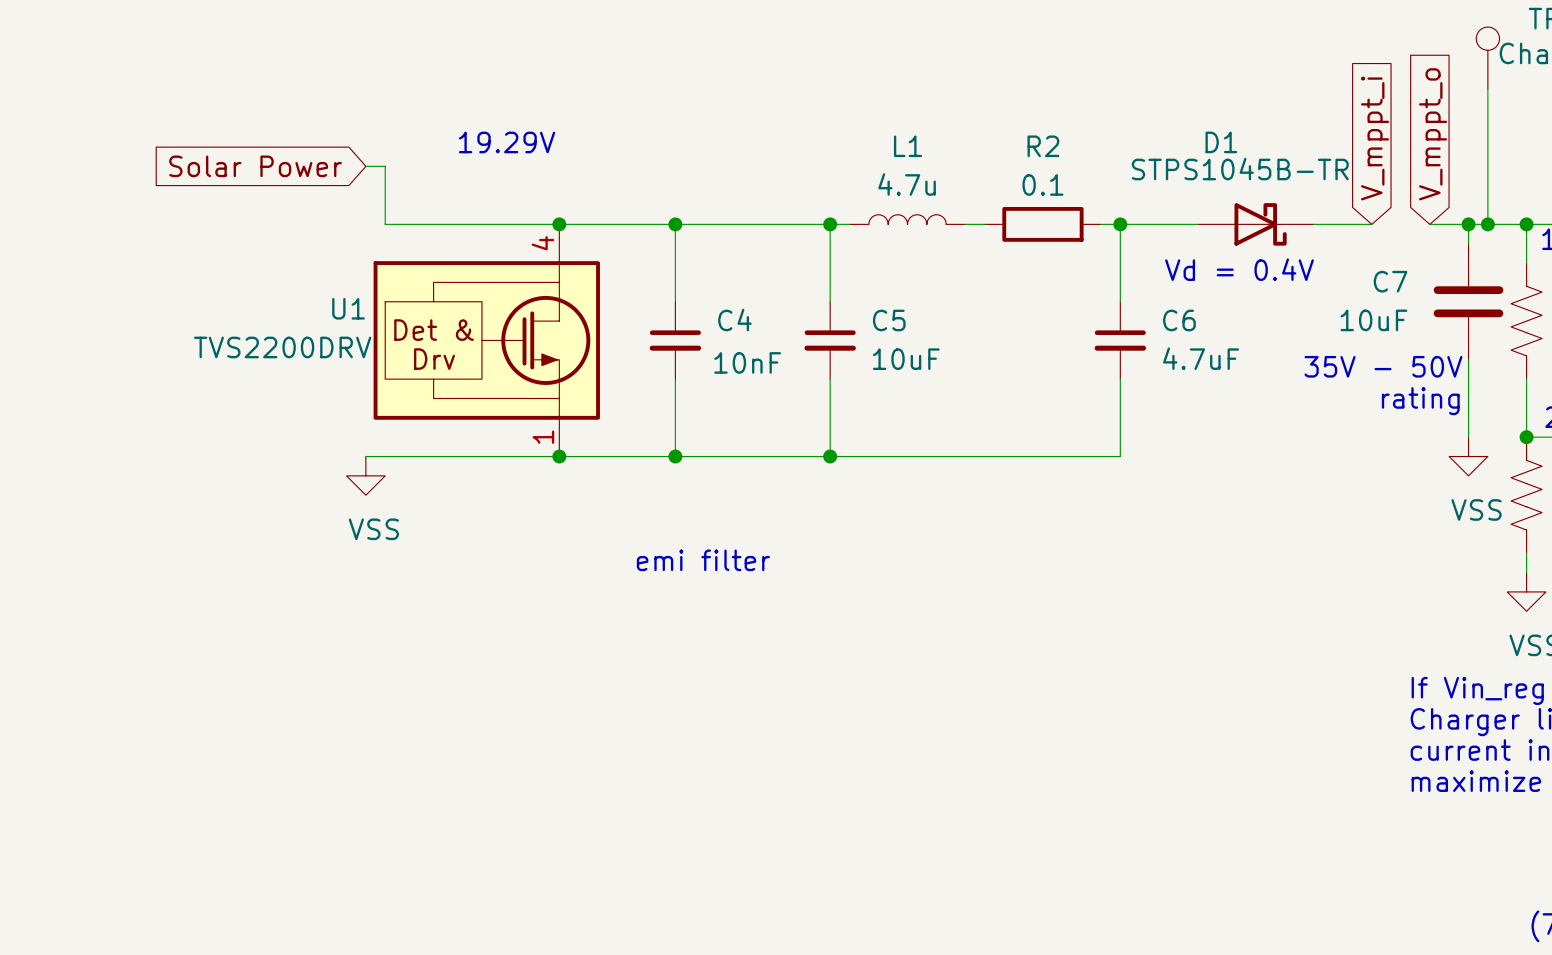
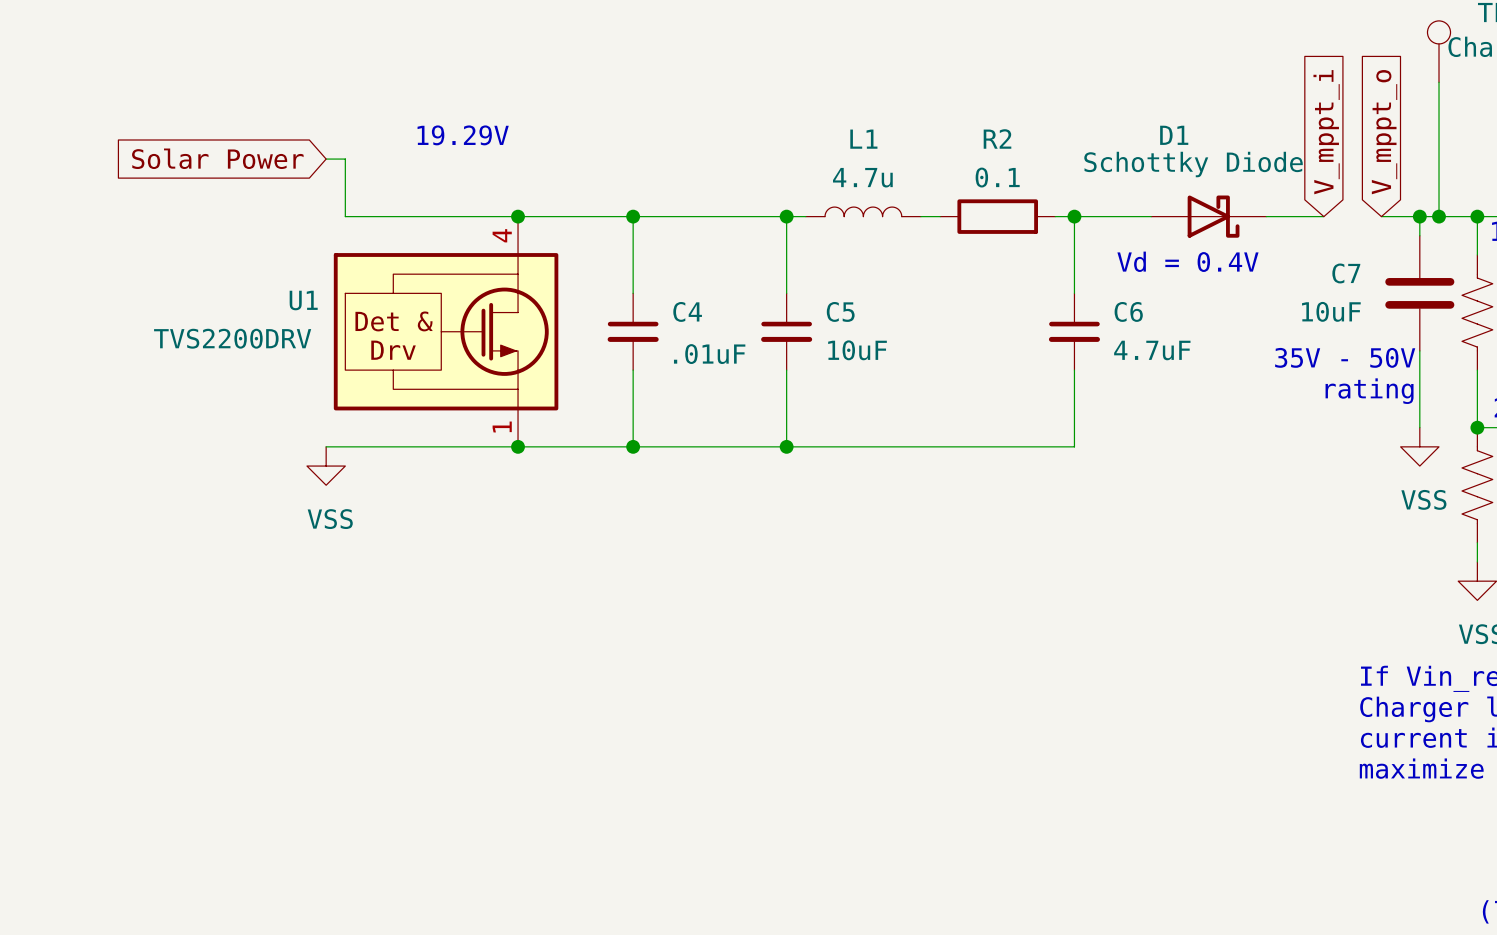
D1 value: STPS1045B-TR (1240, 169) -> Schottky Diode (1193, 164)
C4 value: 10nF (747, 362) -> .01uF (709, 354)
text: emi filter (703, 560) -> none

